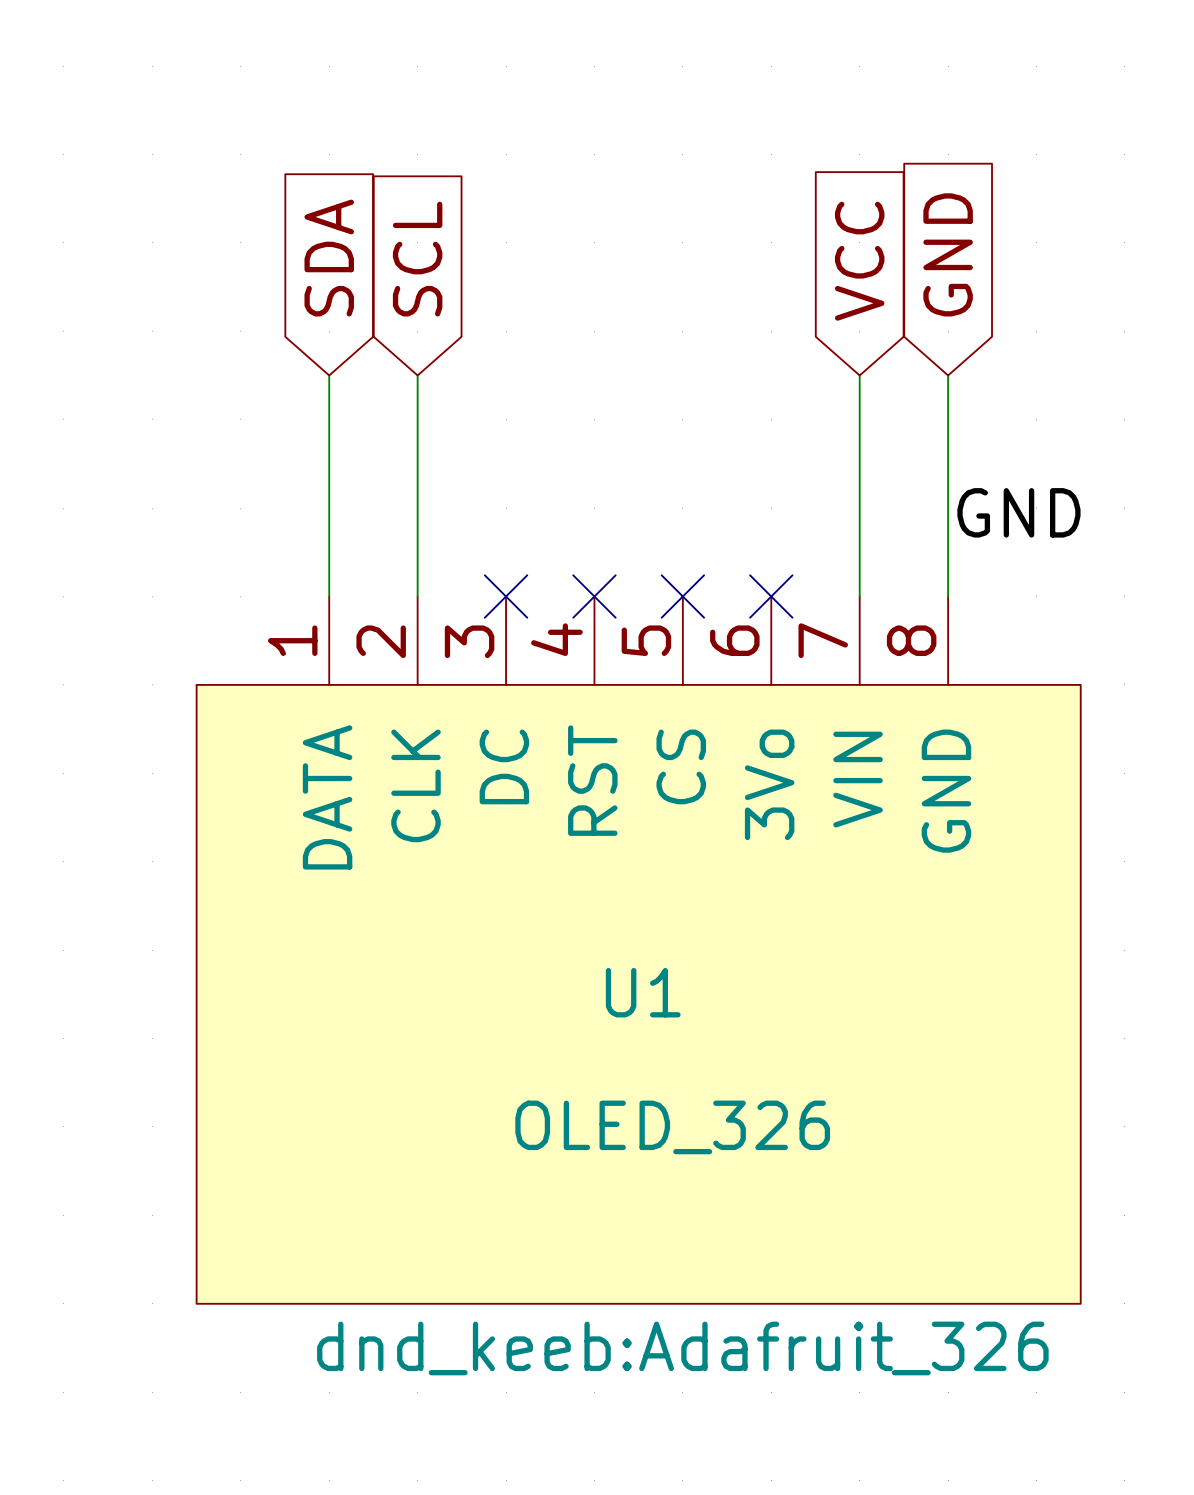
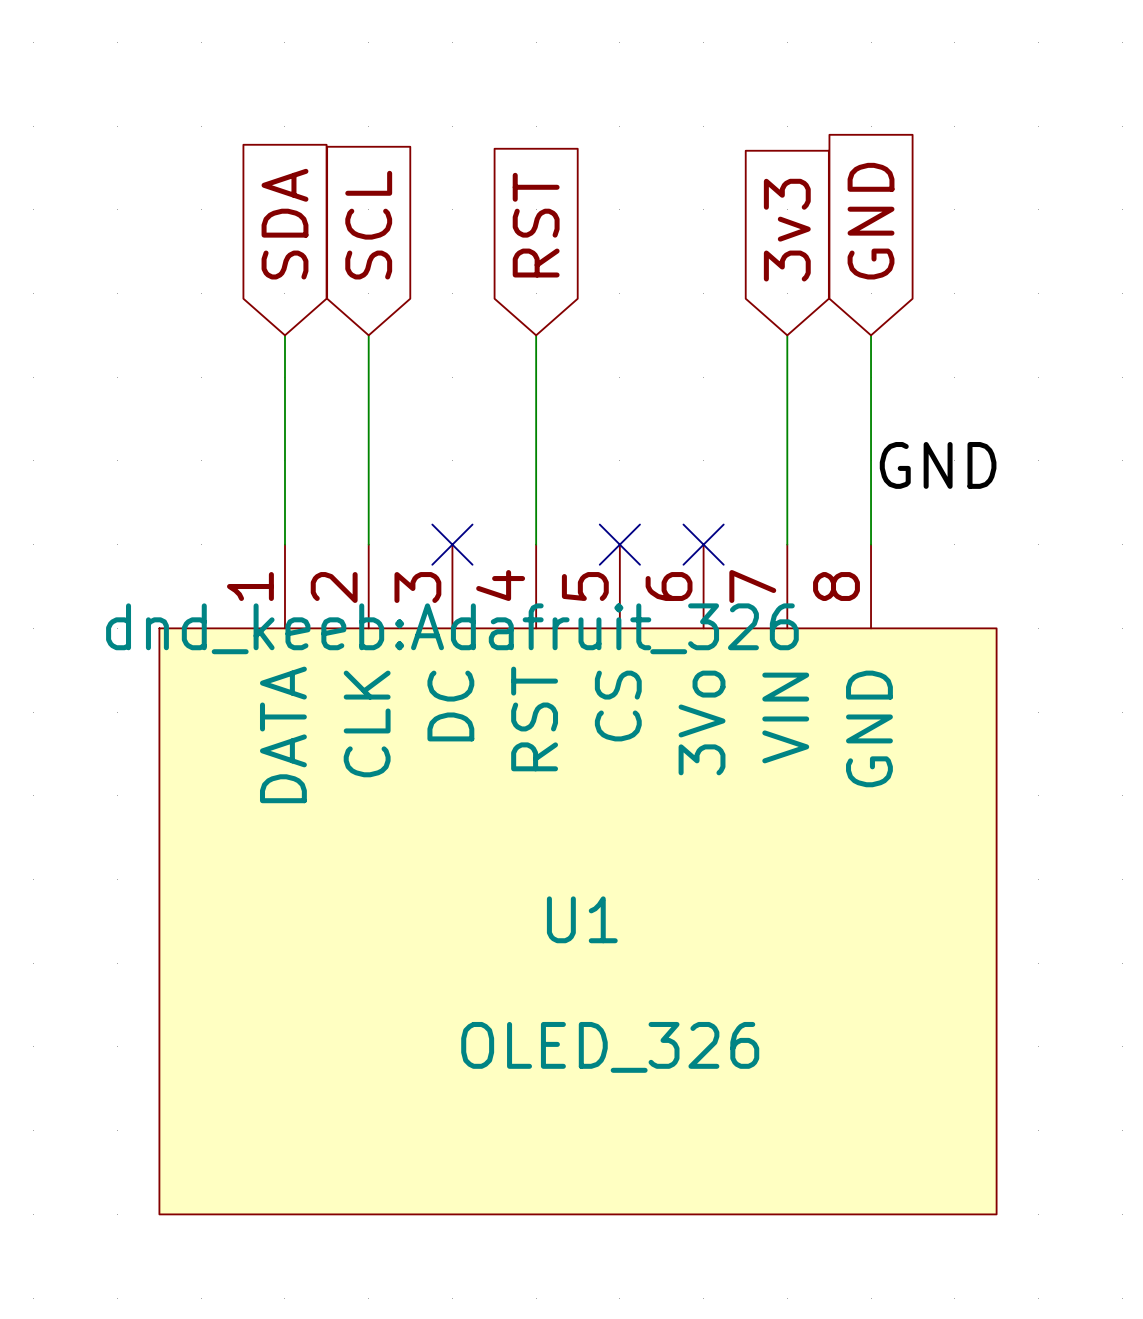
global label: none -> RST (536, 225)
global label: VCC (859, 261) -> 3v3 (787, 230)
wire: none -> (536, 335) (536, 544)
no-connect mark: (594, 596) -> none
U1 text position: dnd_keeb:Adafruit_326 (682, 1348) -> dnd_keeb:Adafruit_326 (452, 628)

